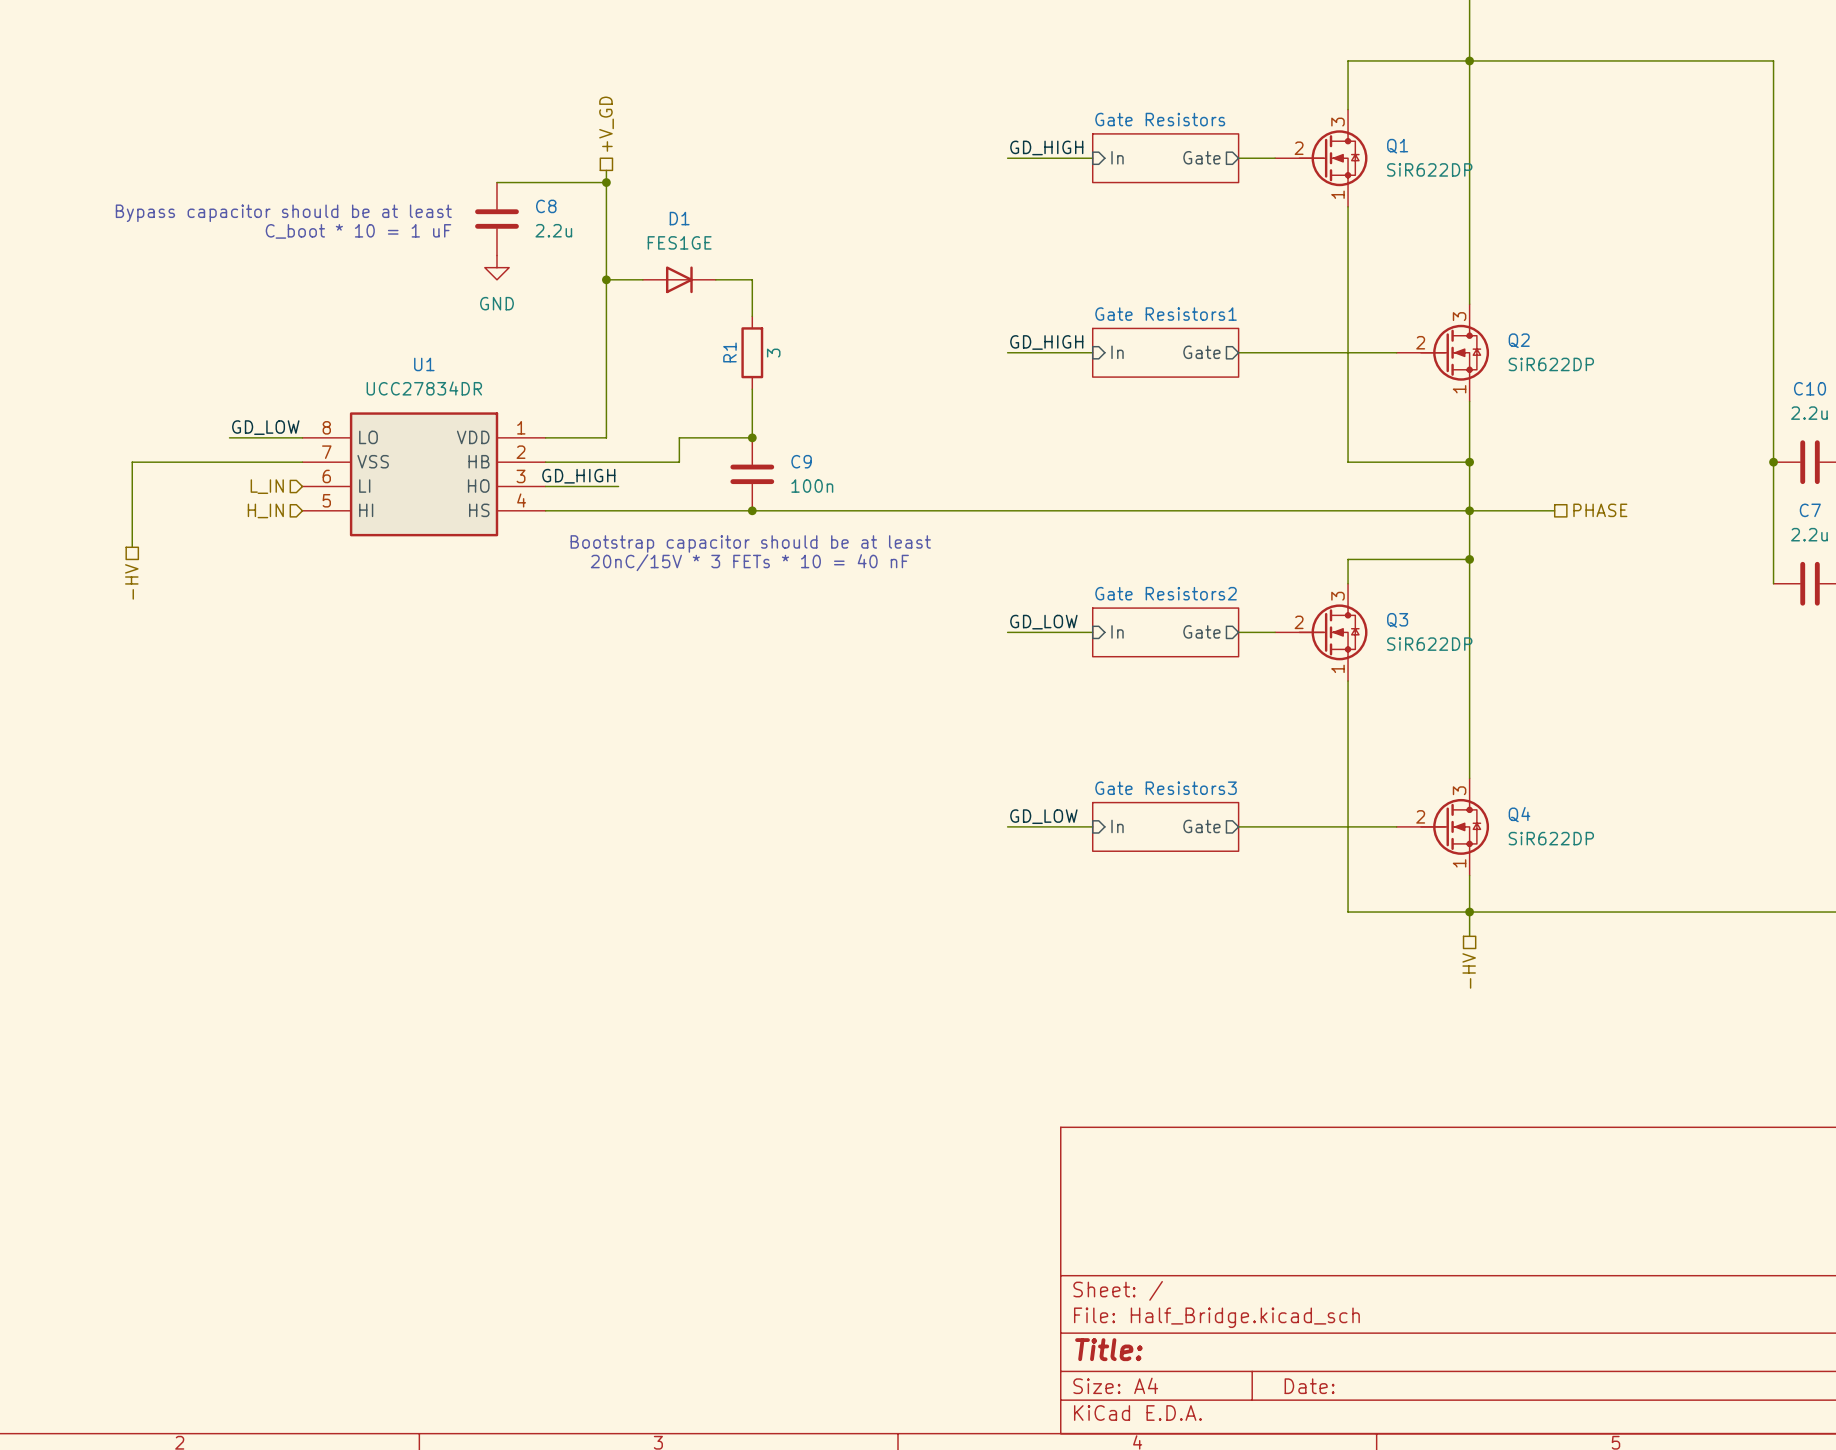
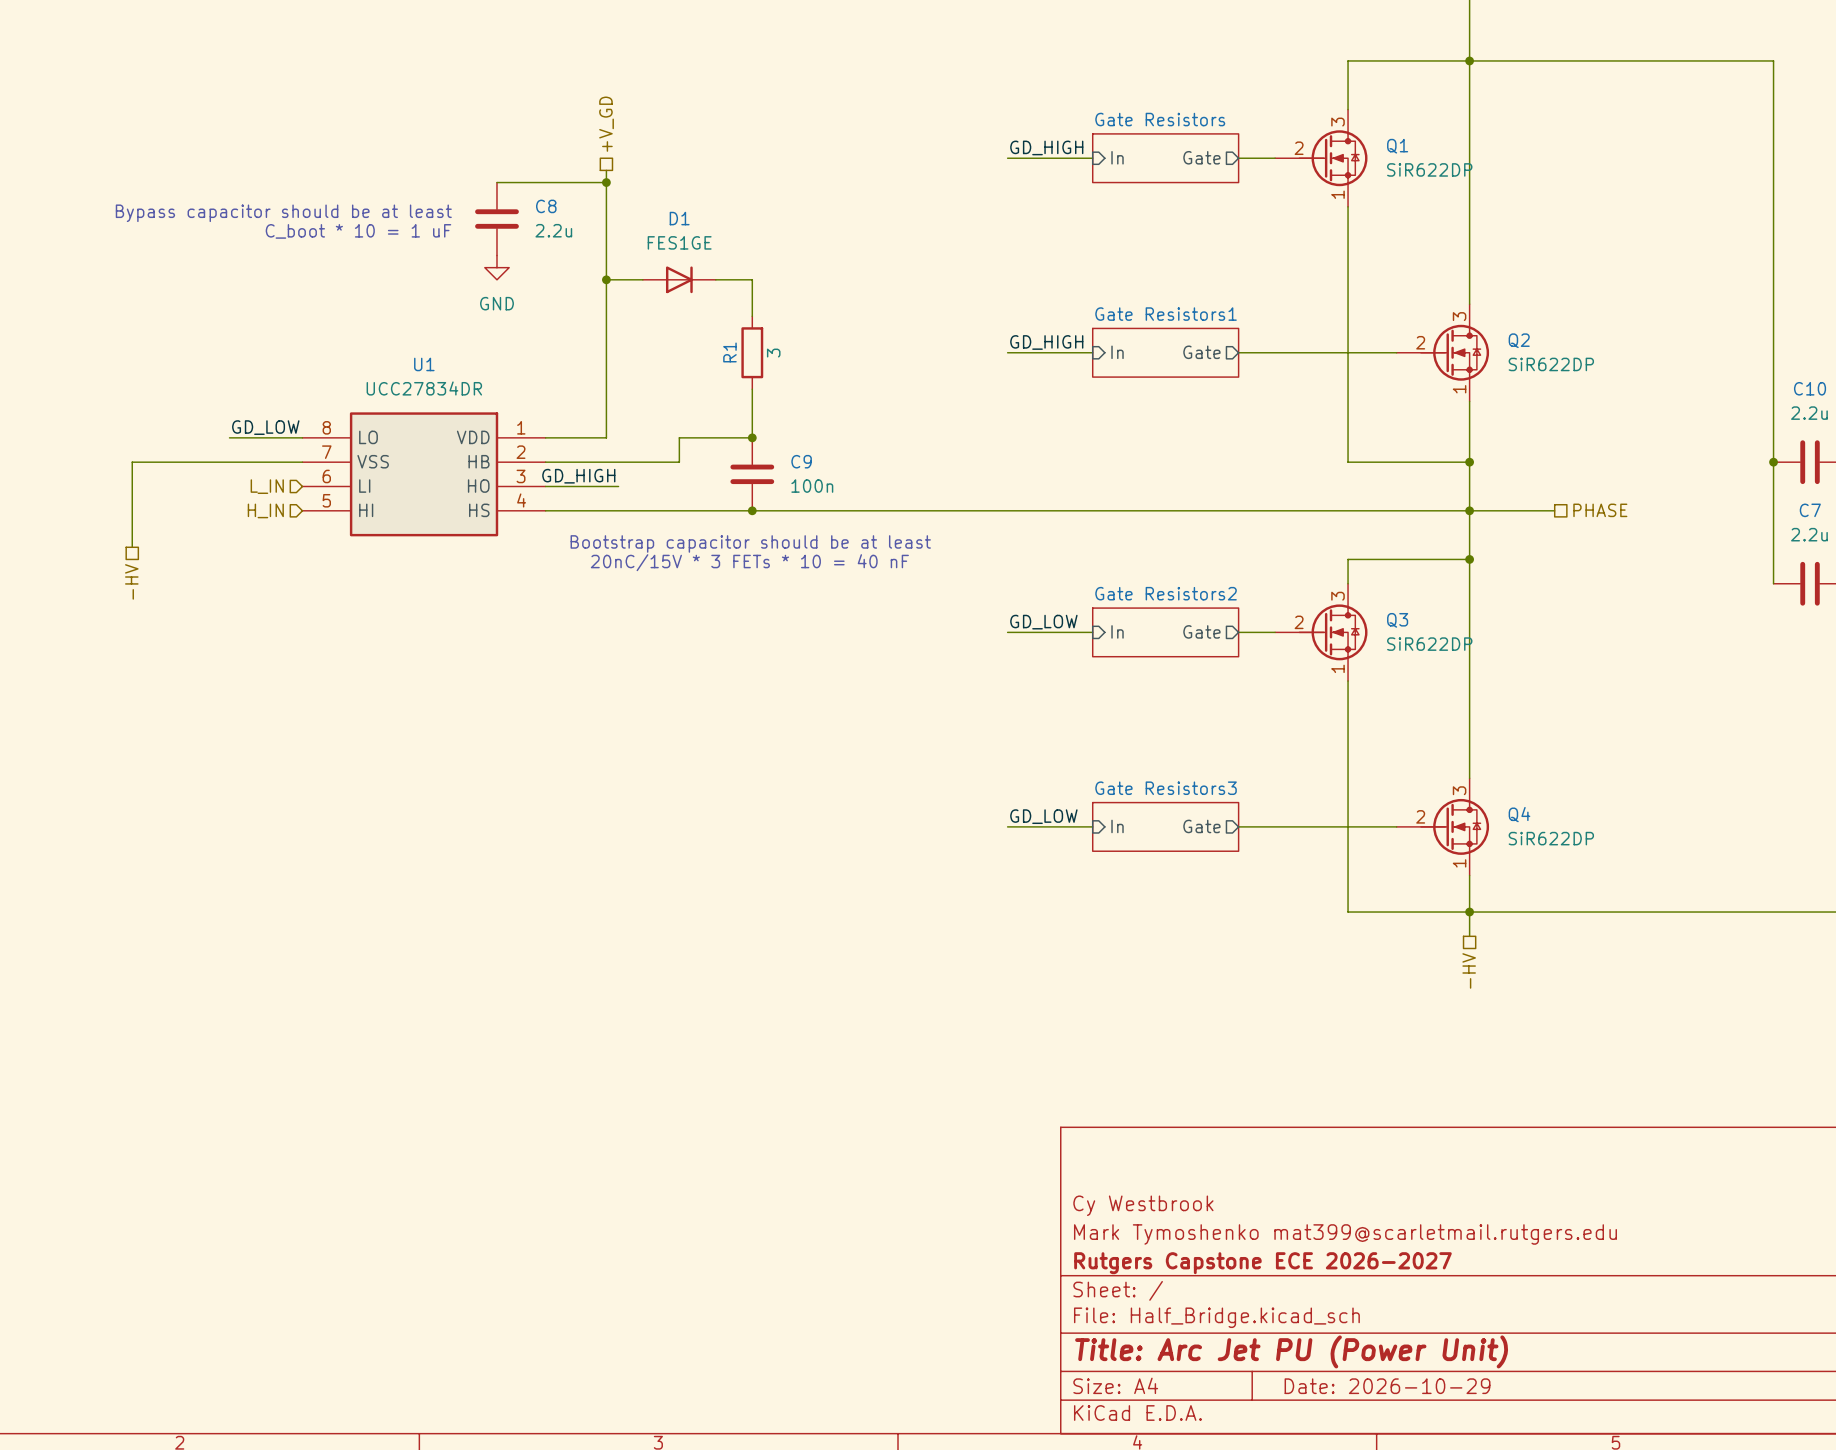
title block: none -> Cy Westbrook (1143, 1205)
title block: none -> Mark Tymoshenko mat399@scarletmail.rutgers.edu (1345, 1234)
title block: none -> Rutgers Capstone ECE 2026-2027 (1262, 1263)
title block: Title: (1108, 1349) -> Title: Arc Jet PU (Power Unit) (1291, 1351)
title block: Date: (1309, 1386) -> Date: 2026-10-29 (1387, 1386)

